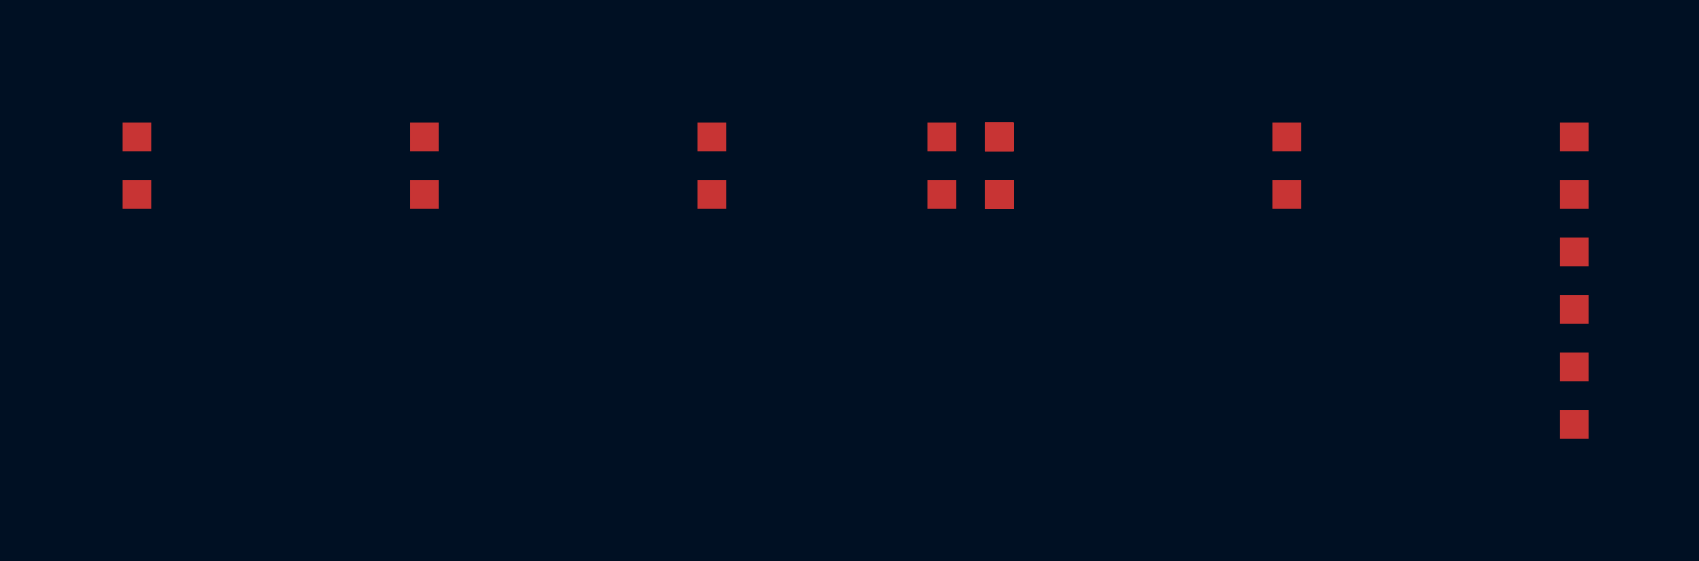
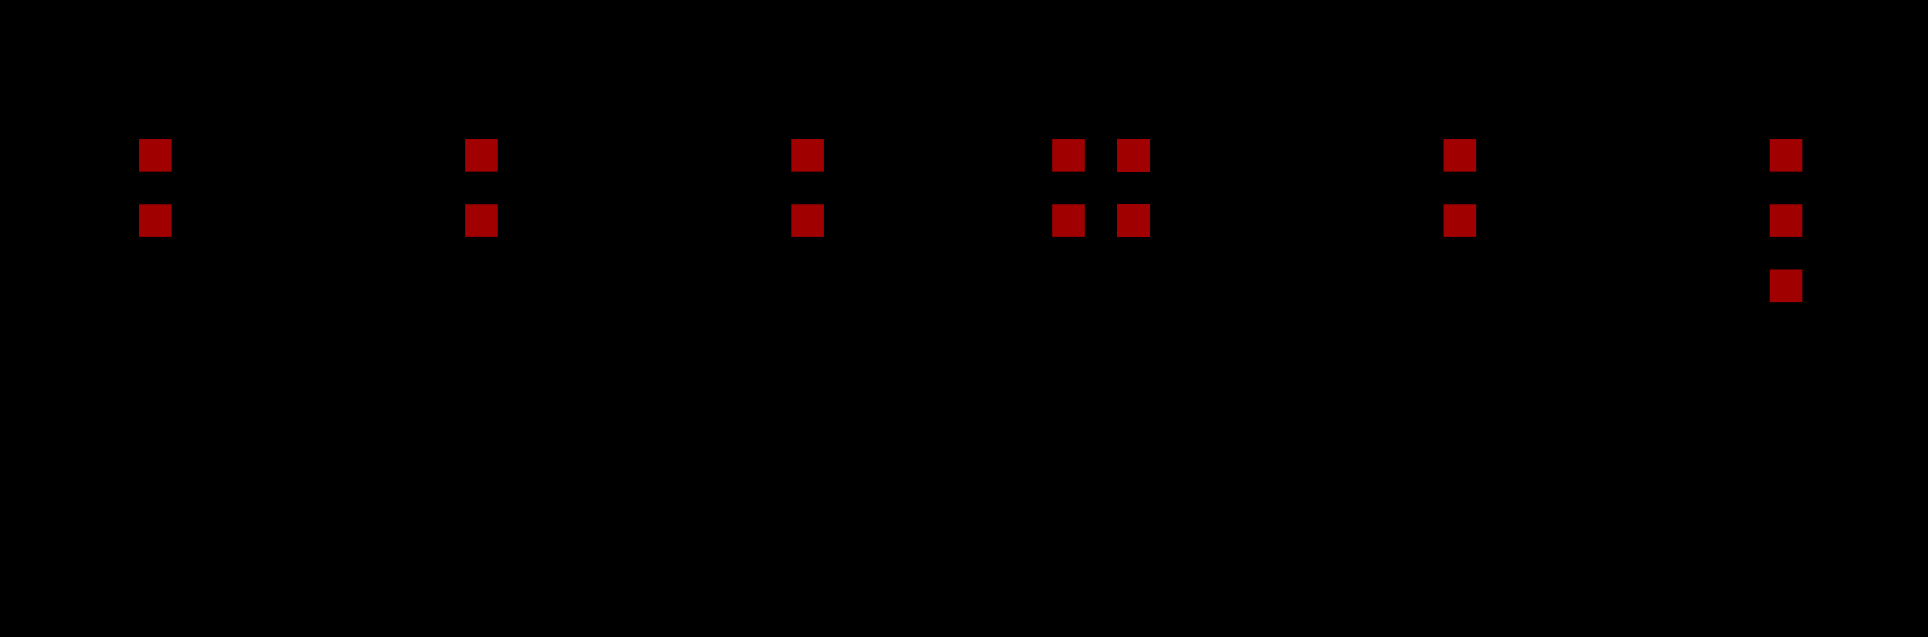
part: (1574, 280) -> none

